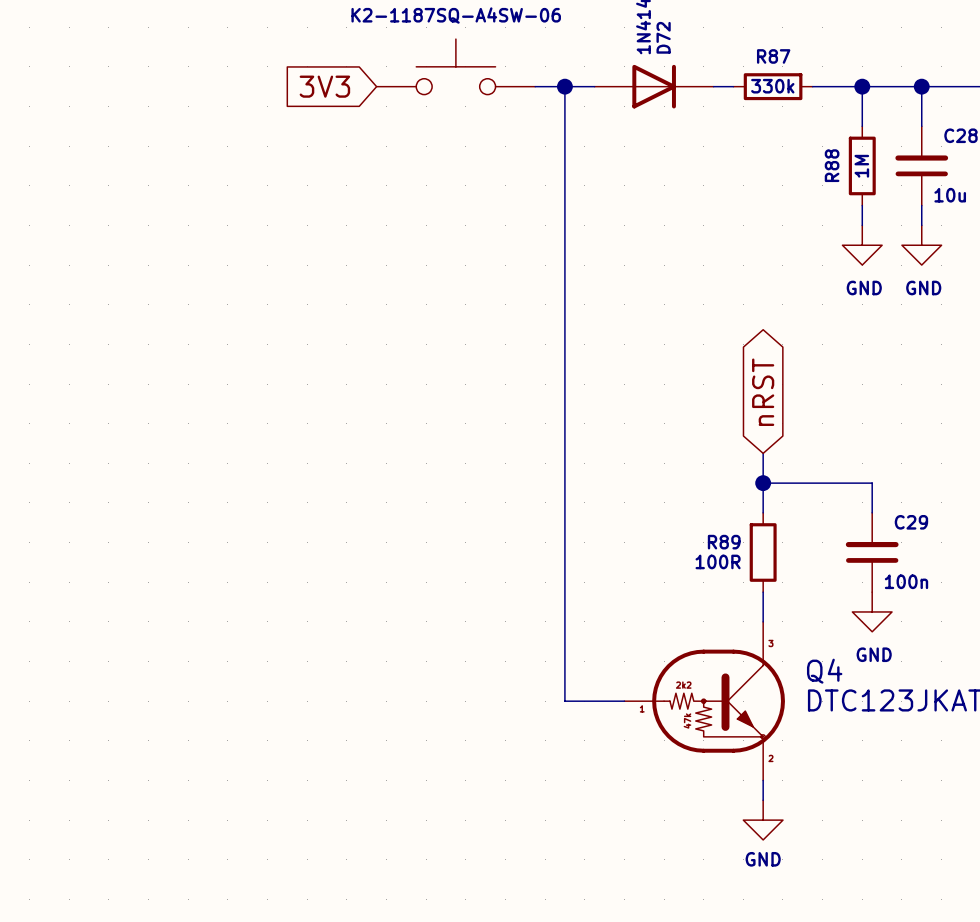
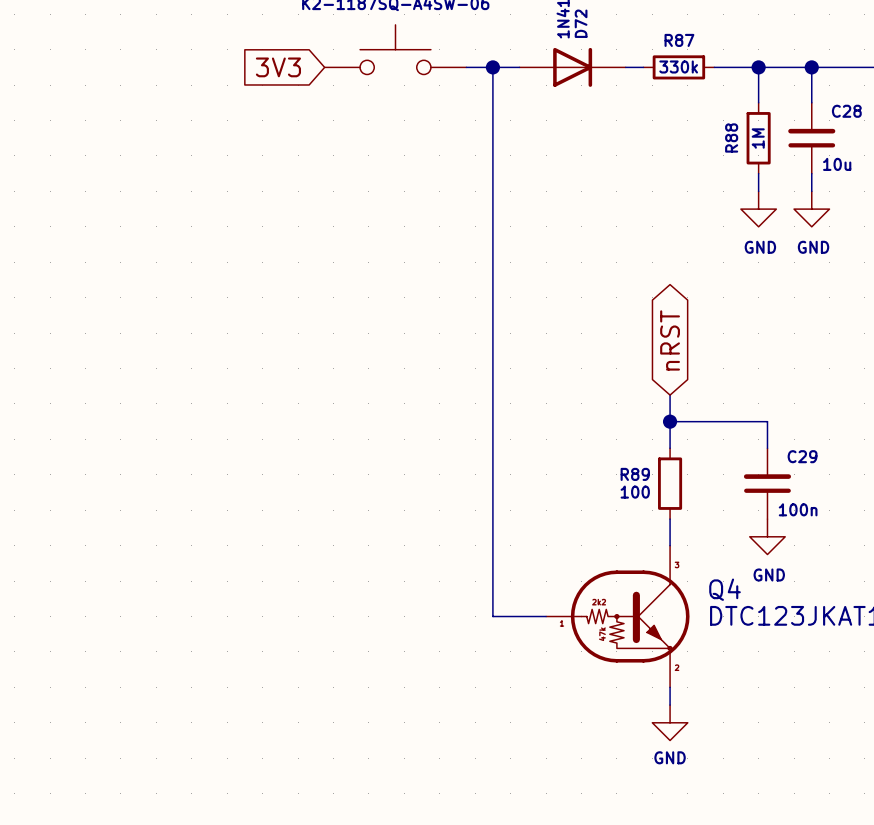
R89 value: 100R (718, 561) -> 100 (635, 492)

